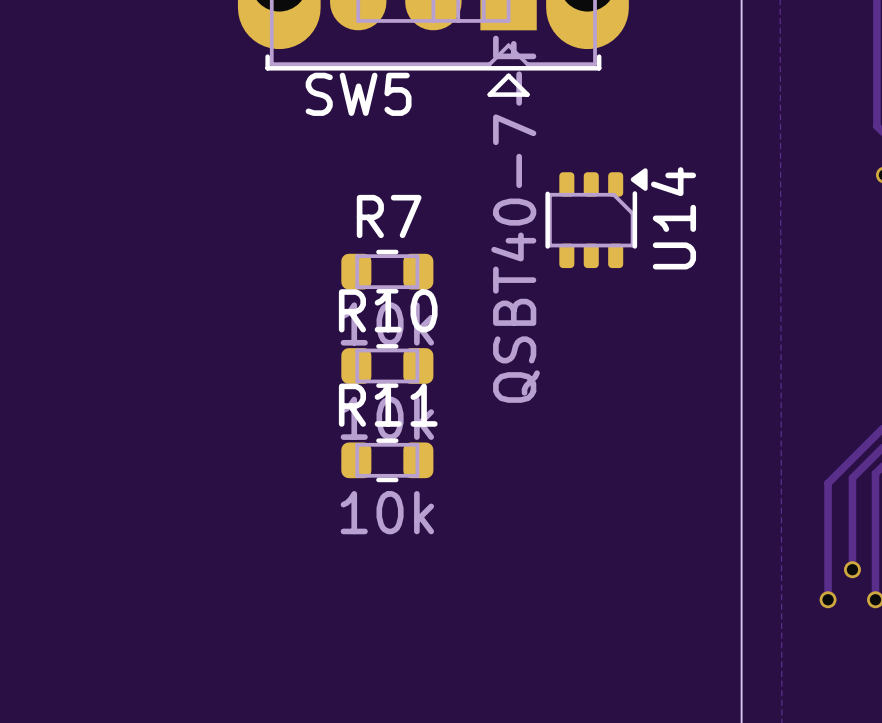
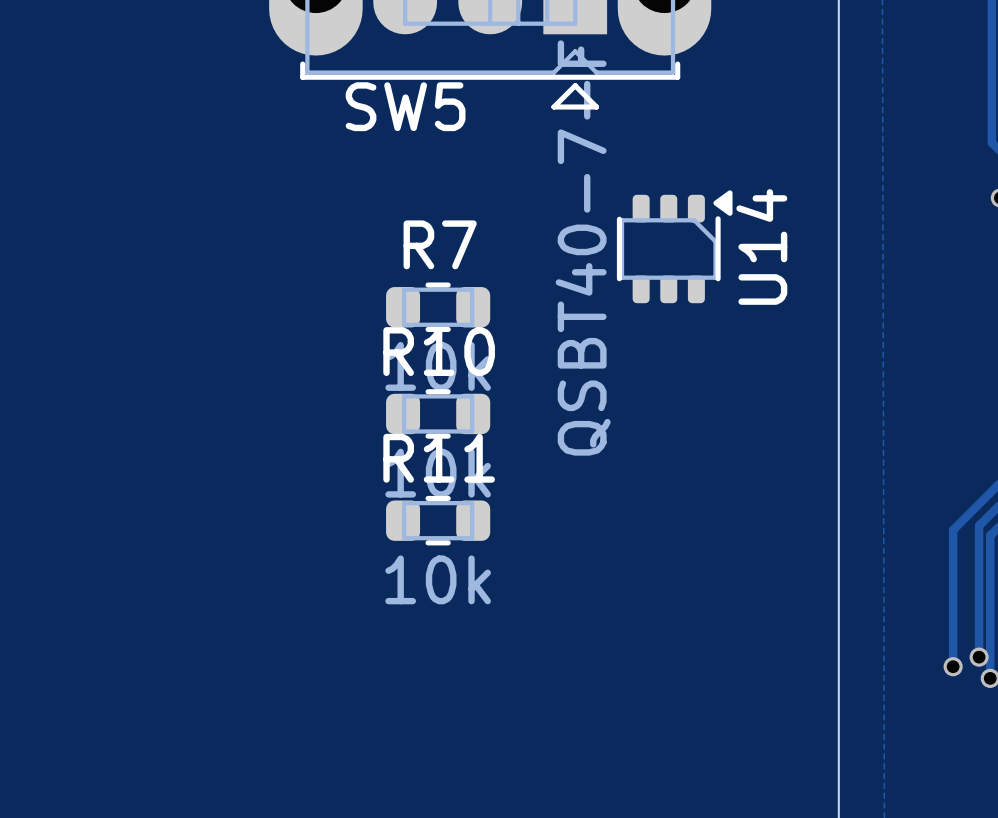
track: (865, 464) (852, 478) (852, 569) -> (979, 525) (979, 657)
track: (842, 468) (828, 483) (828, 599) -> (953, 530) (953, 666)
via position: (852, 569) -> (979, 657)
via position: (828, 599) -> (953, 666)

